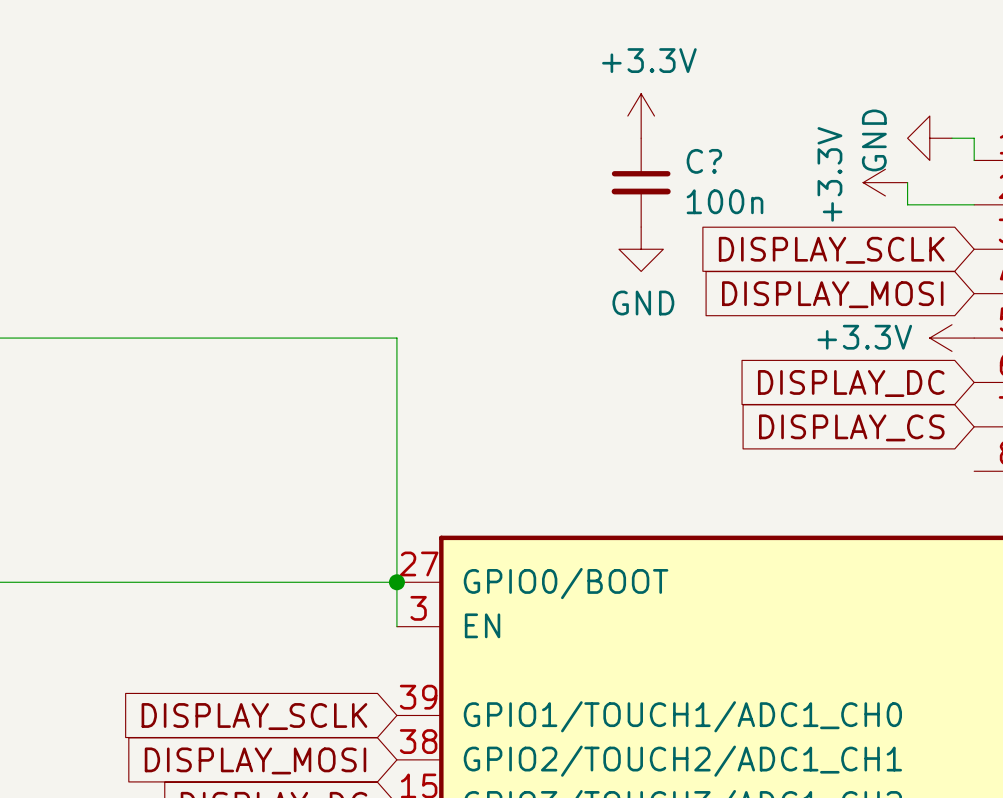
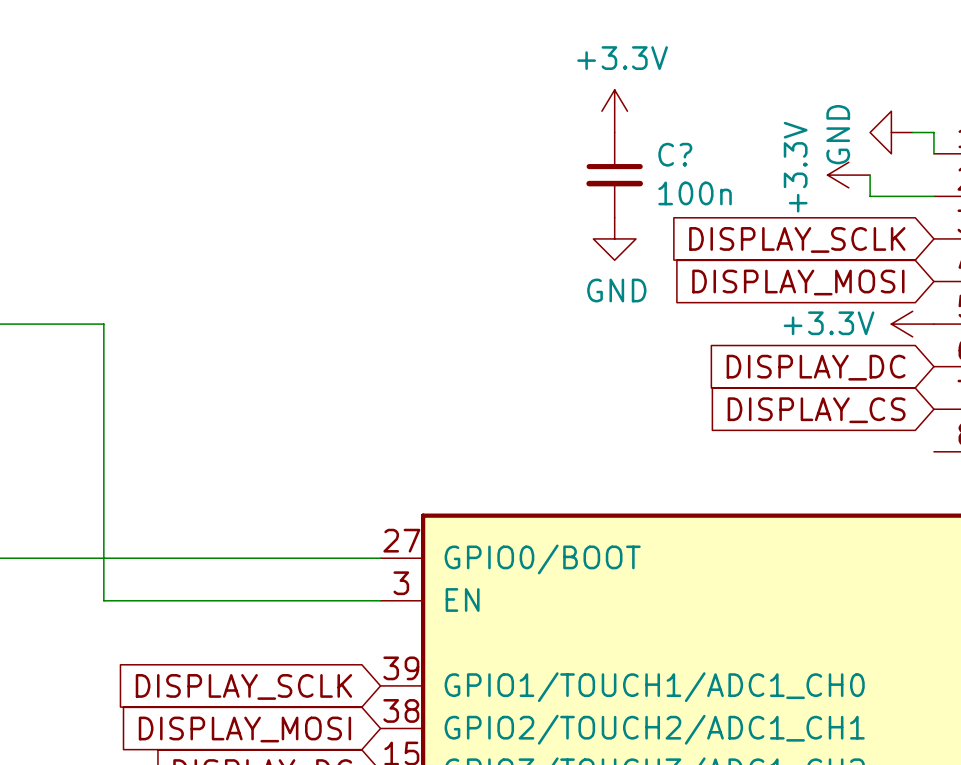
wire: (108, 338) (396, 338) (396, 626) -> (103, 324) (103, 600) (380, 600)
junction: (396, 582) -> none

